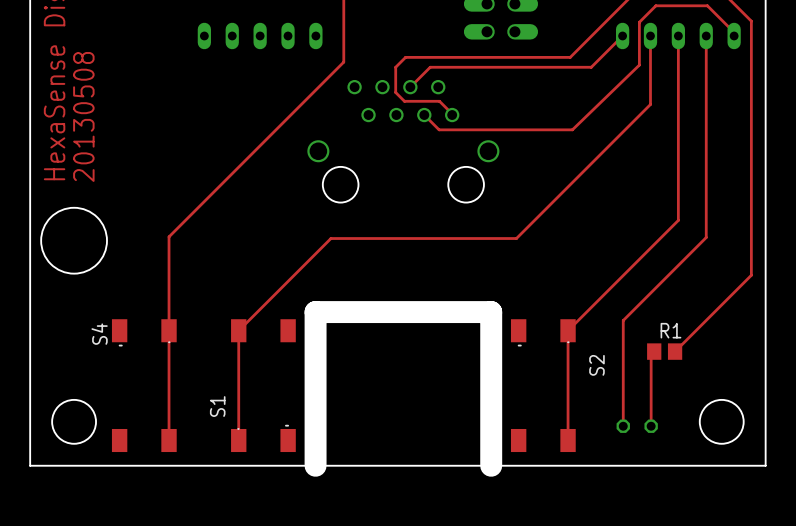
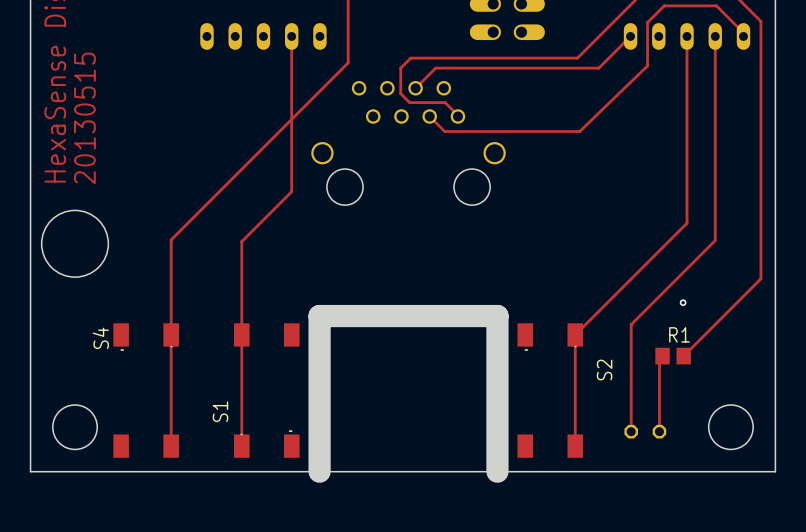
track: (650, 35) (650, 104) (516, 238) (330, 238) (238, 330) -> (291, 36) (291, 191) (241, 241) (241, 334)
text: 20130508 (83, 116) -> 20130515 (84, 118)
via: none -> (683, 302)

